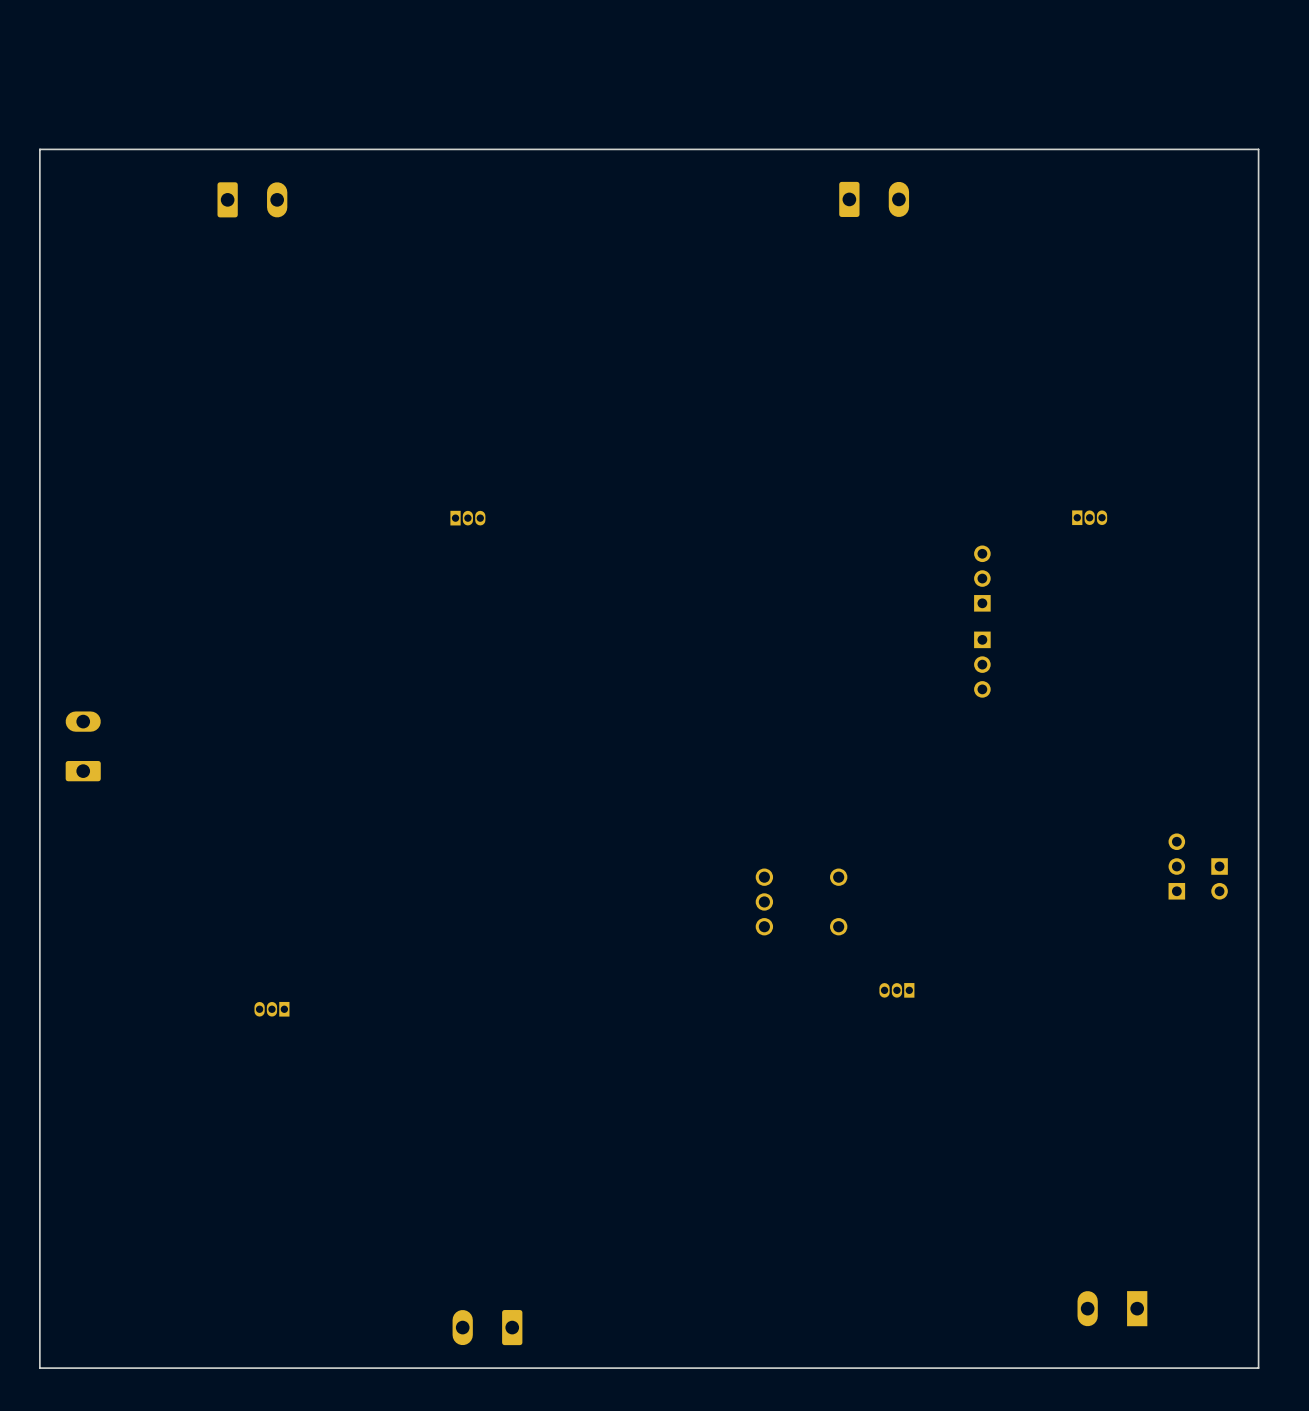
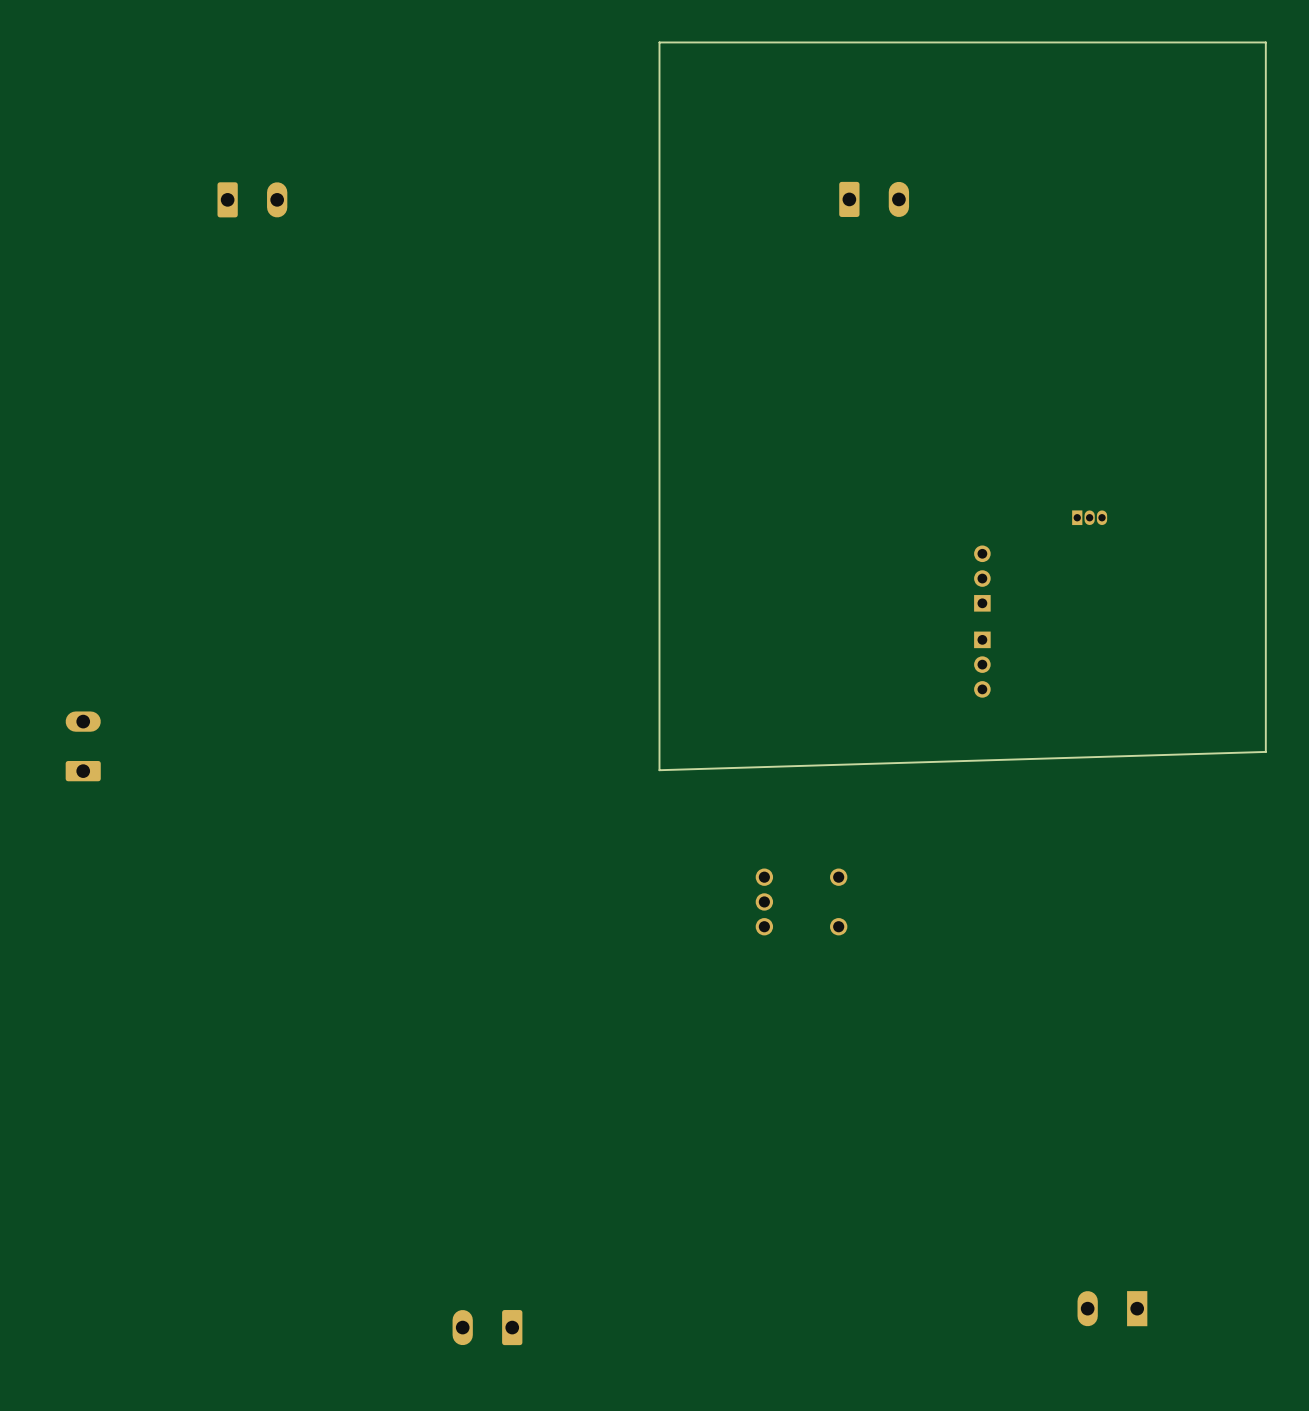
board edge: none -> (1265, 42) (1265, 751) (659, 770) (659, 42) (1265, 42)
board edge: (1258, 149) (1258, 1368) (39, 1368) (39, 149) (1258, 149) -> none
part: (467, 518) -> none
part: (1176, 866) -> none
part: (1219, 878) -> none
part: (896, 990) -> none
part: (271, 1009) -> none

